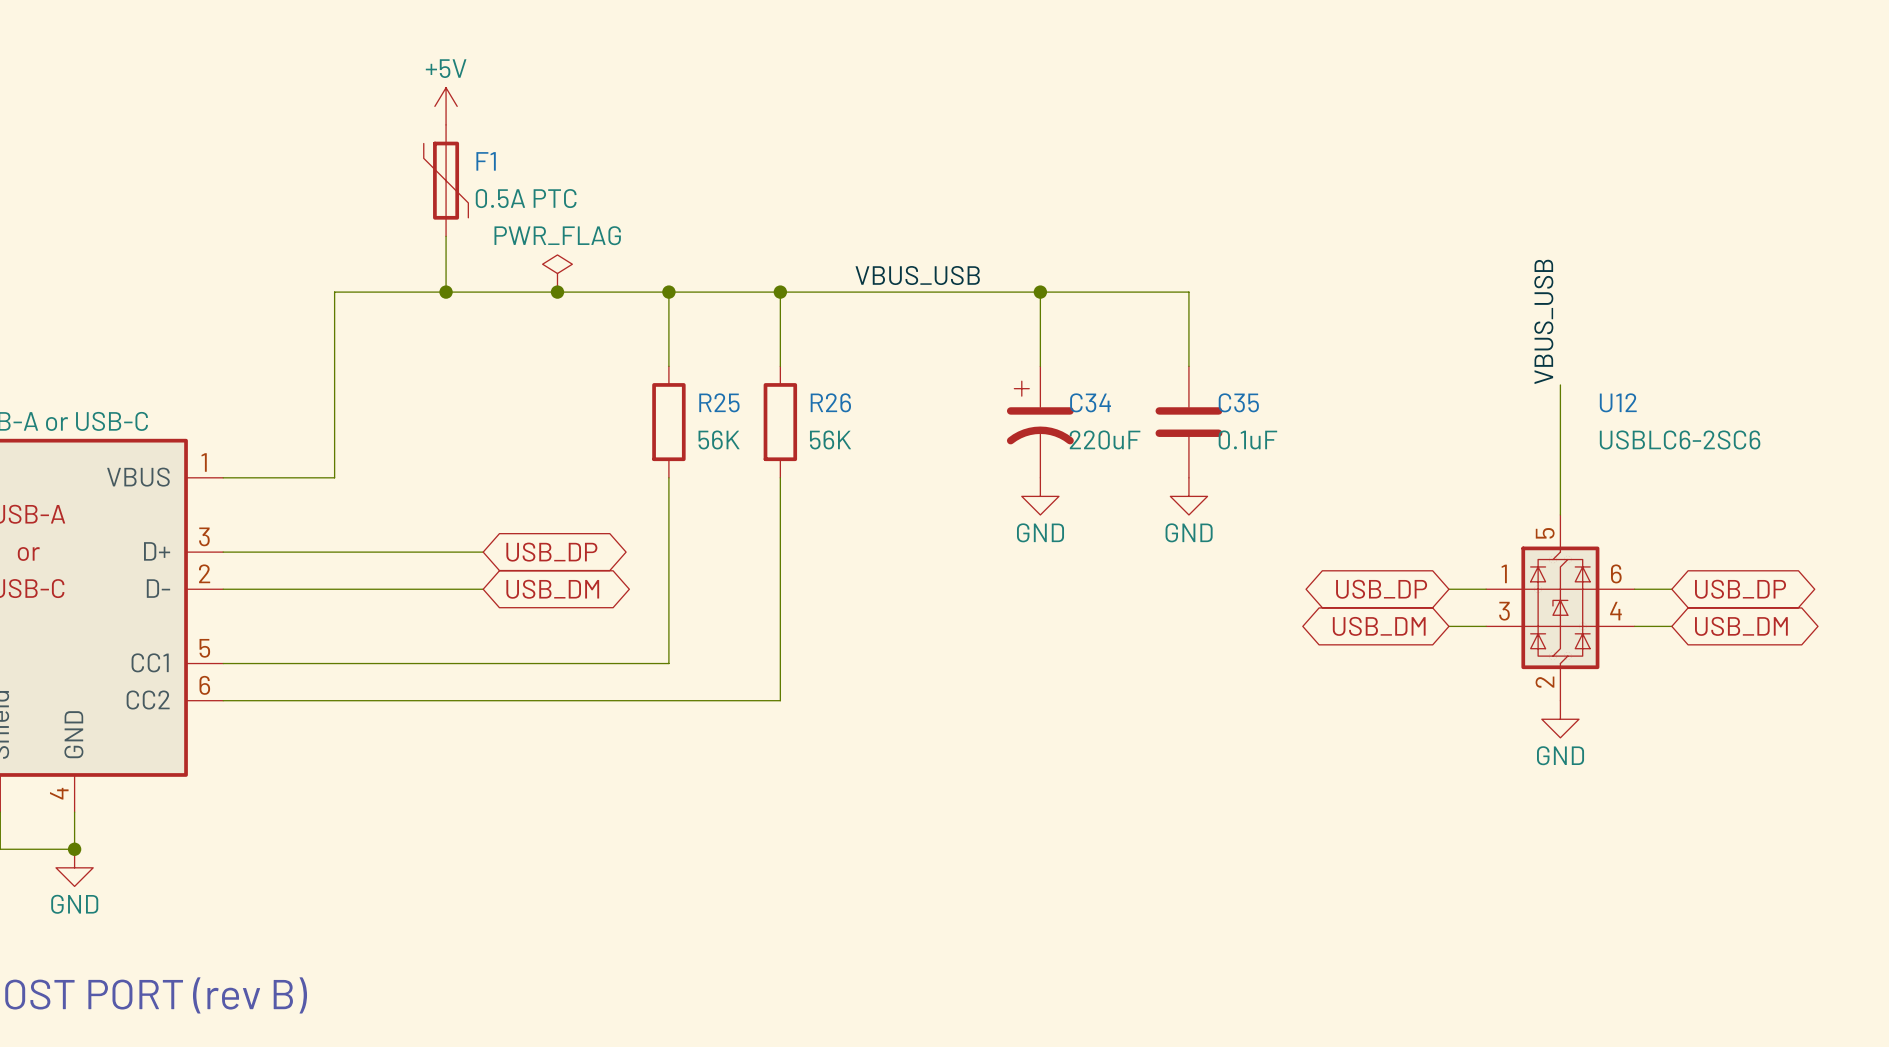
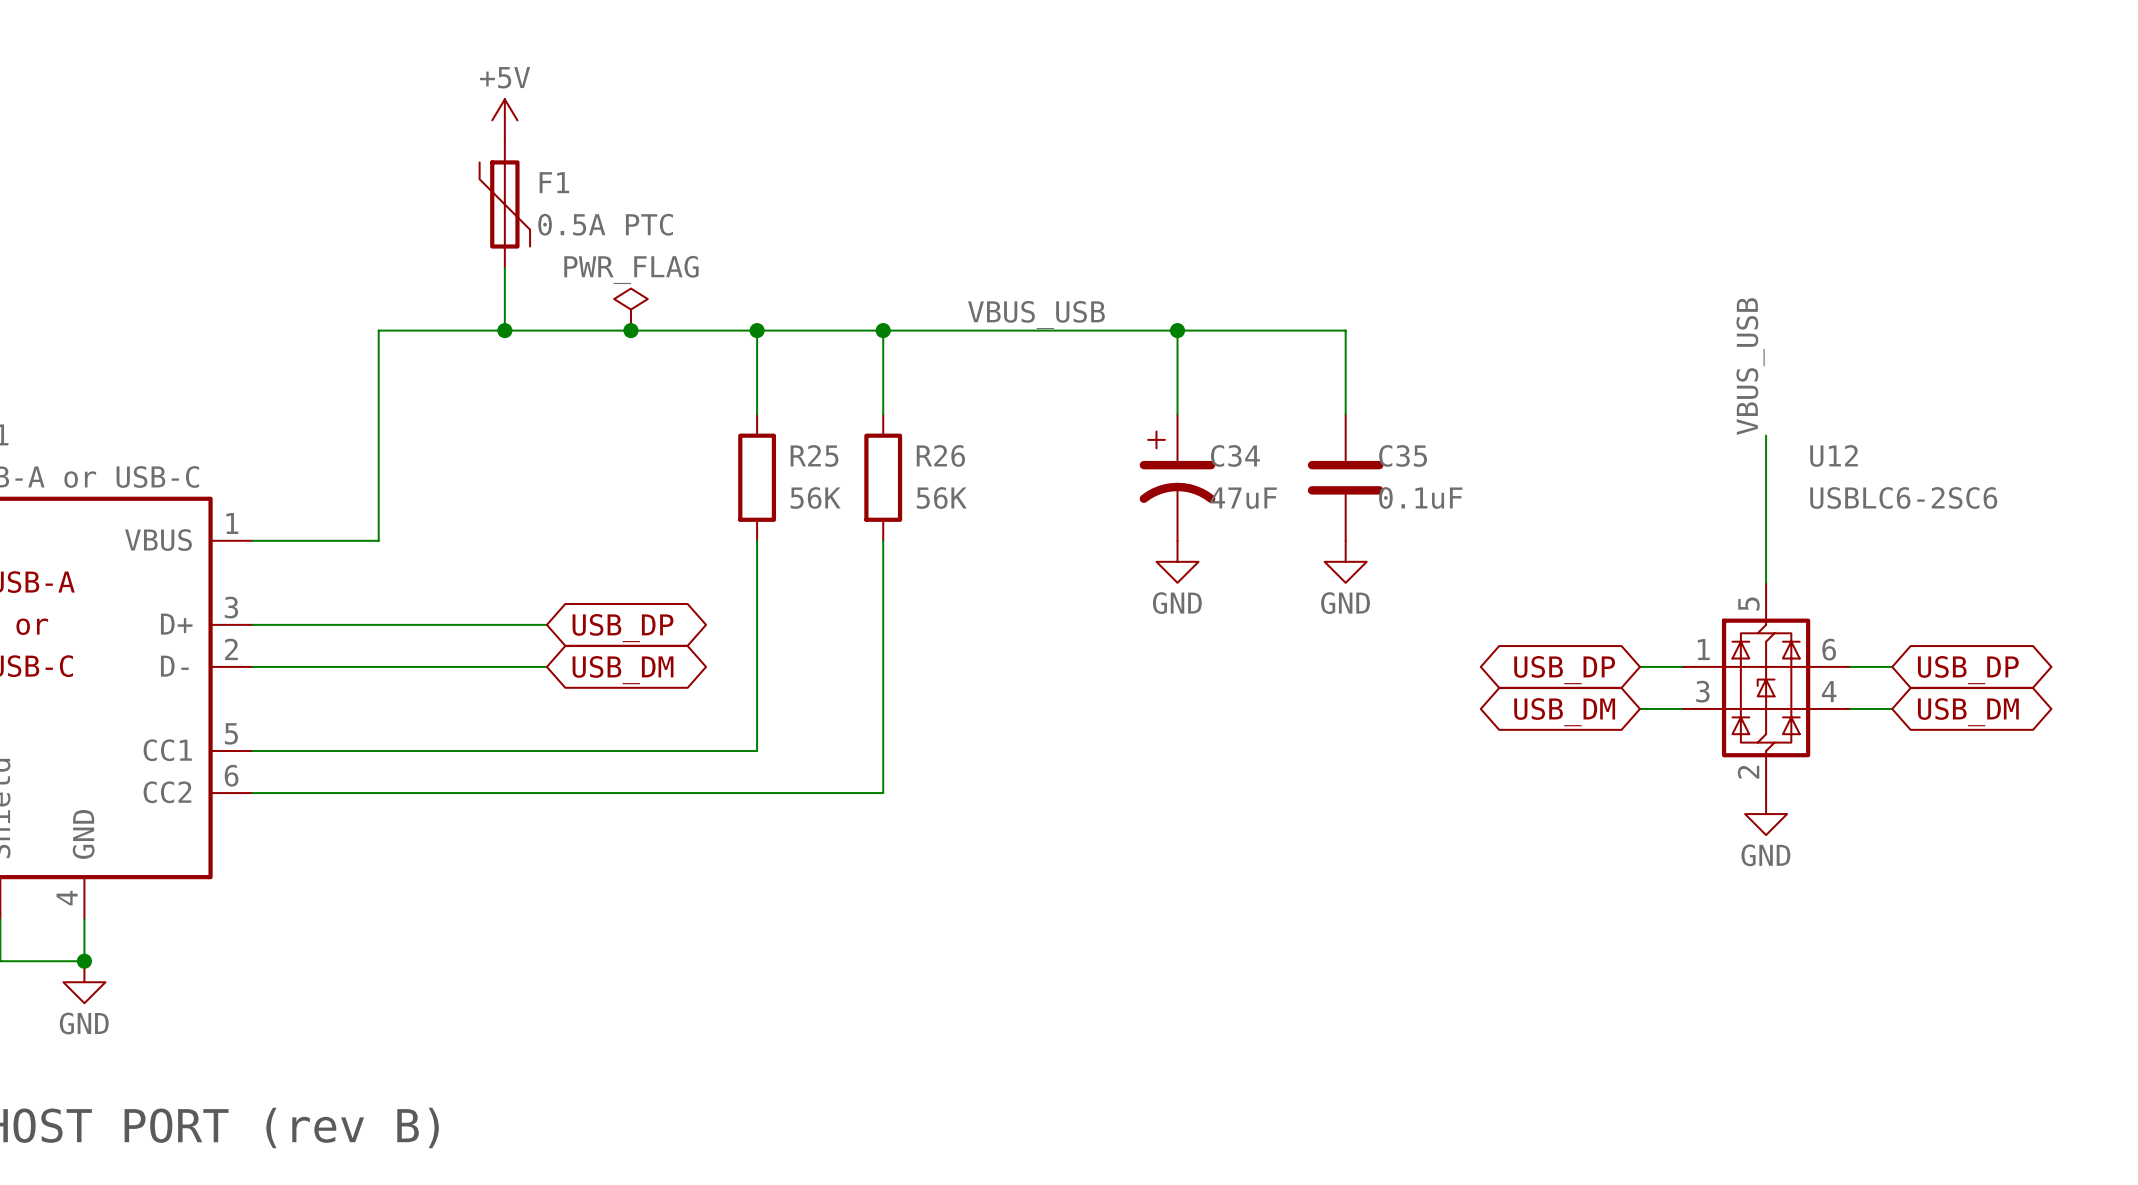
C34 value: 220uF (1105, 439) -> 47uF (1243, 498)

